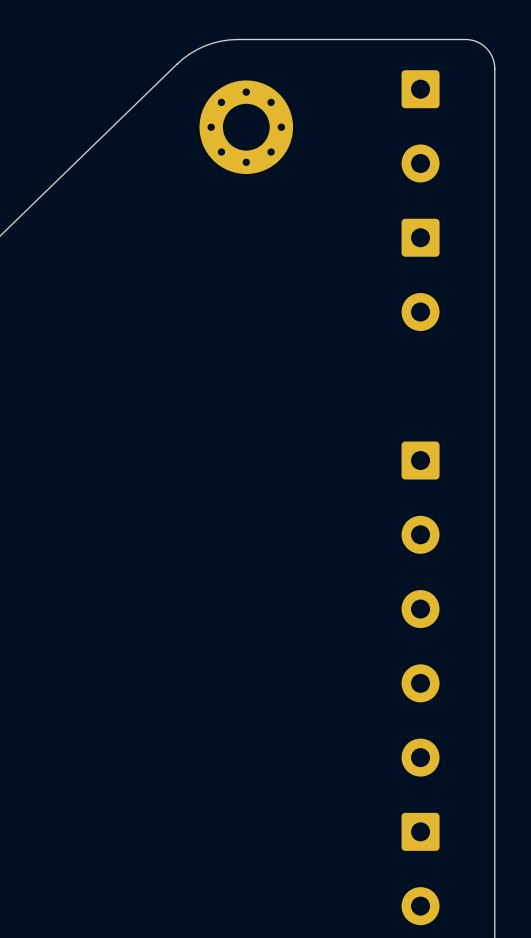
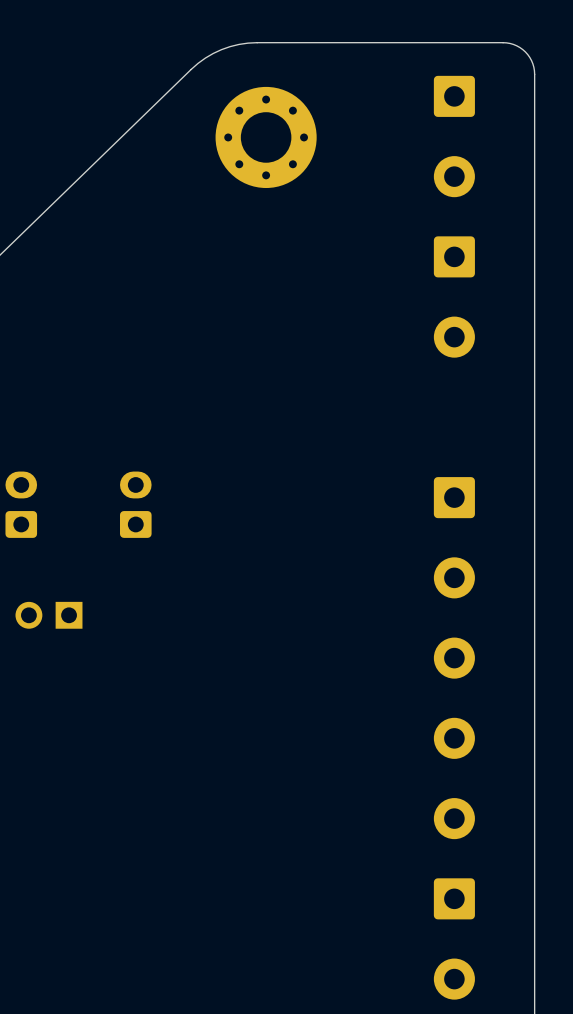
part: none -> (21, 504)
part: none -> (135, 504)
part: none -> (48, 615)

